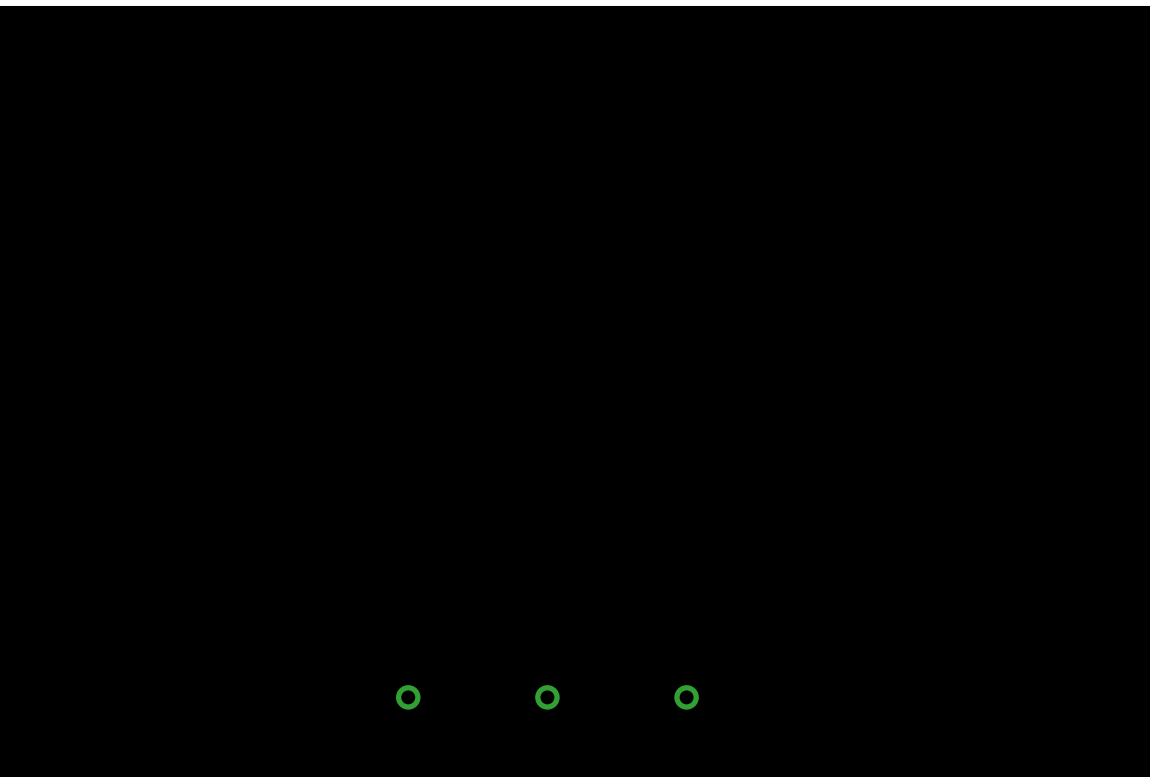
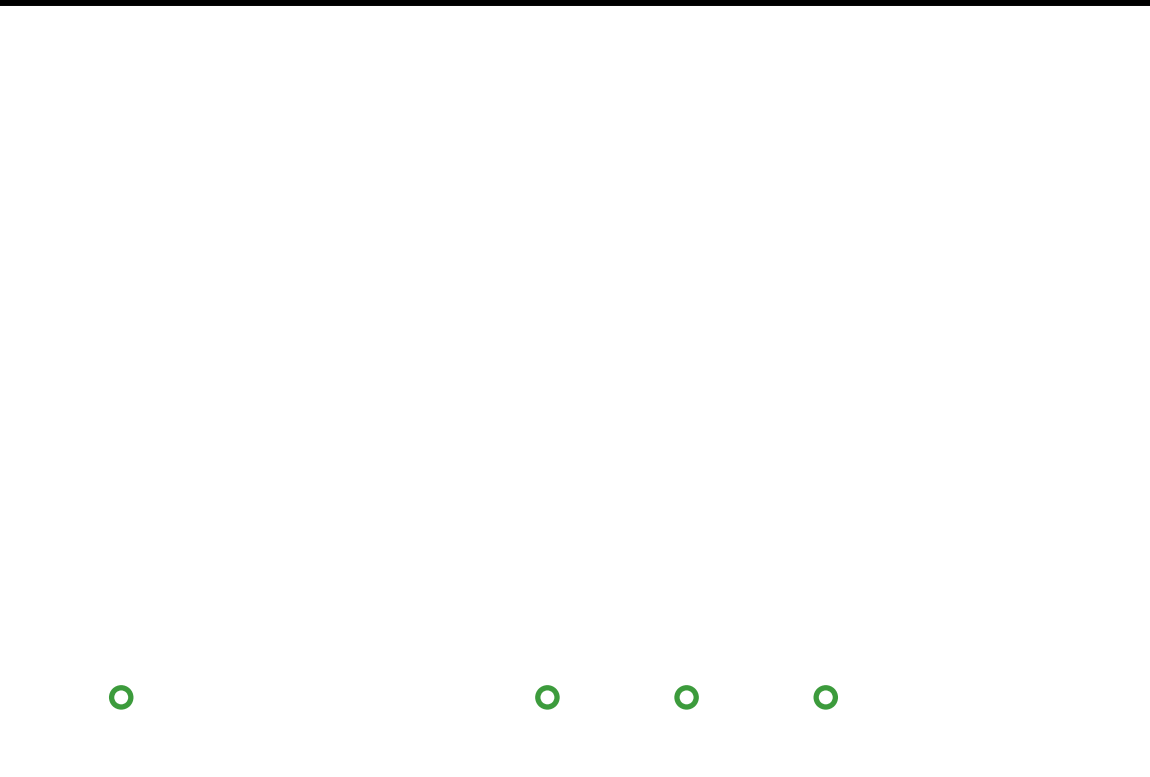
part: none -> (121, 697)
part: (408, 697) -> none
part: none -> (825, 697)

